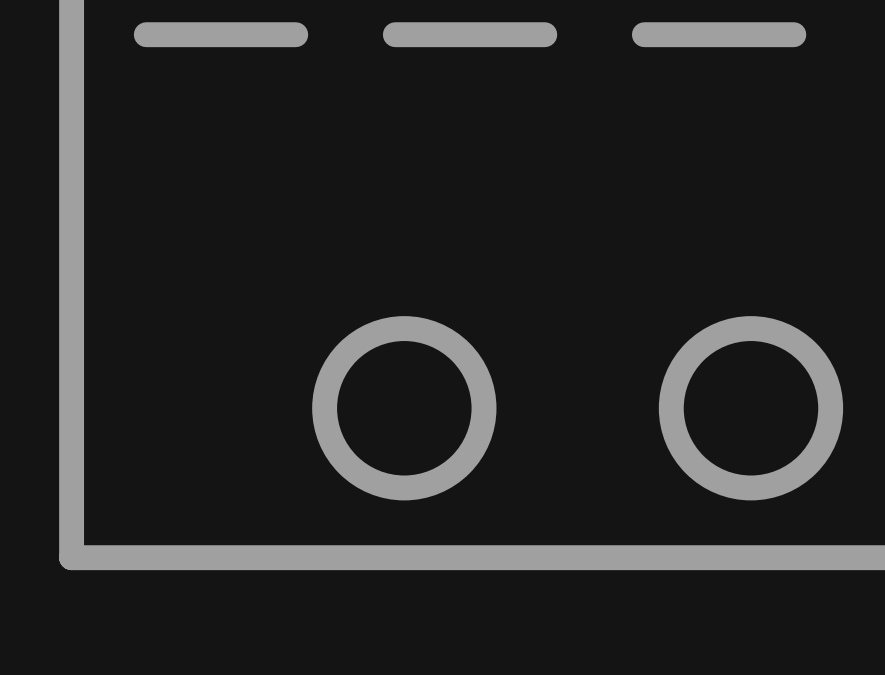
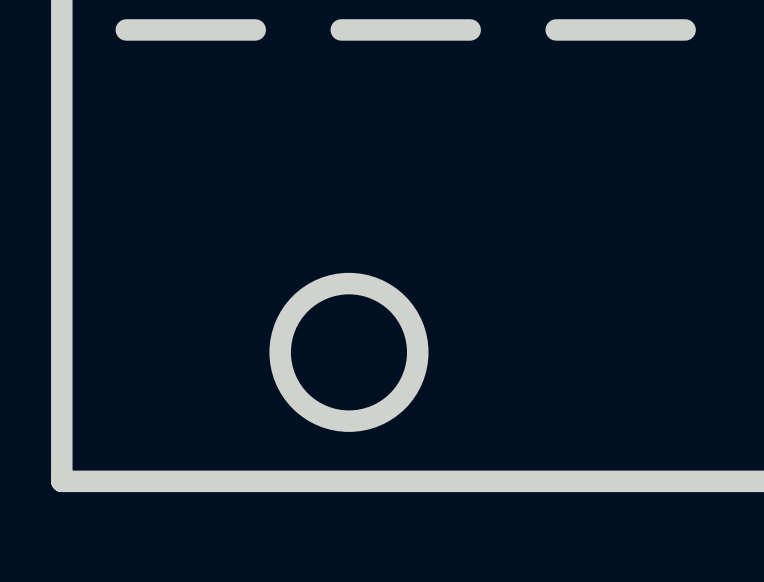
round board edge: [658, 316, 844, 501] -> none

